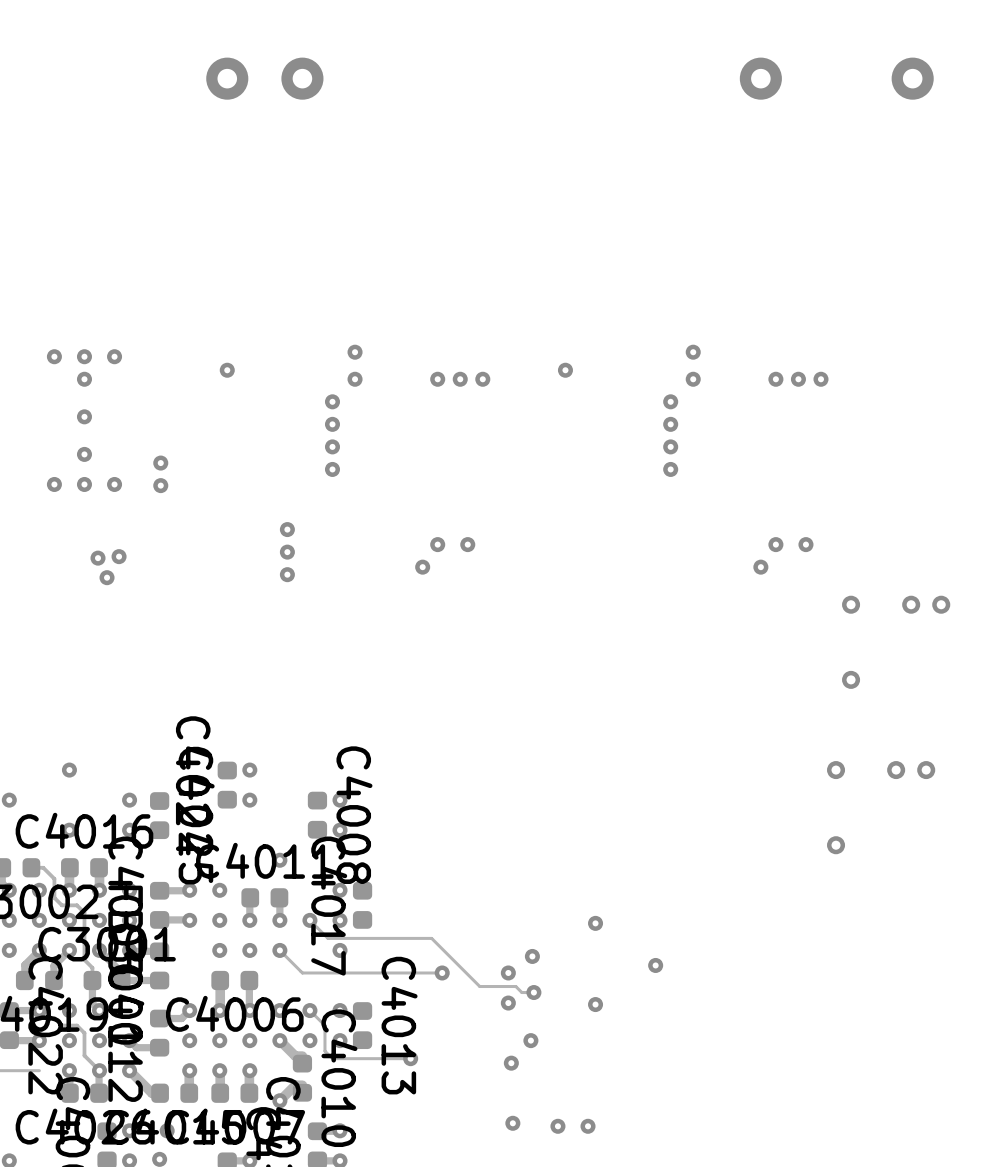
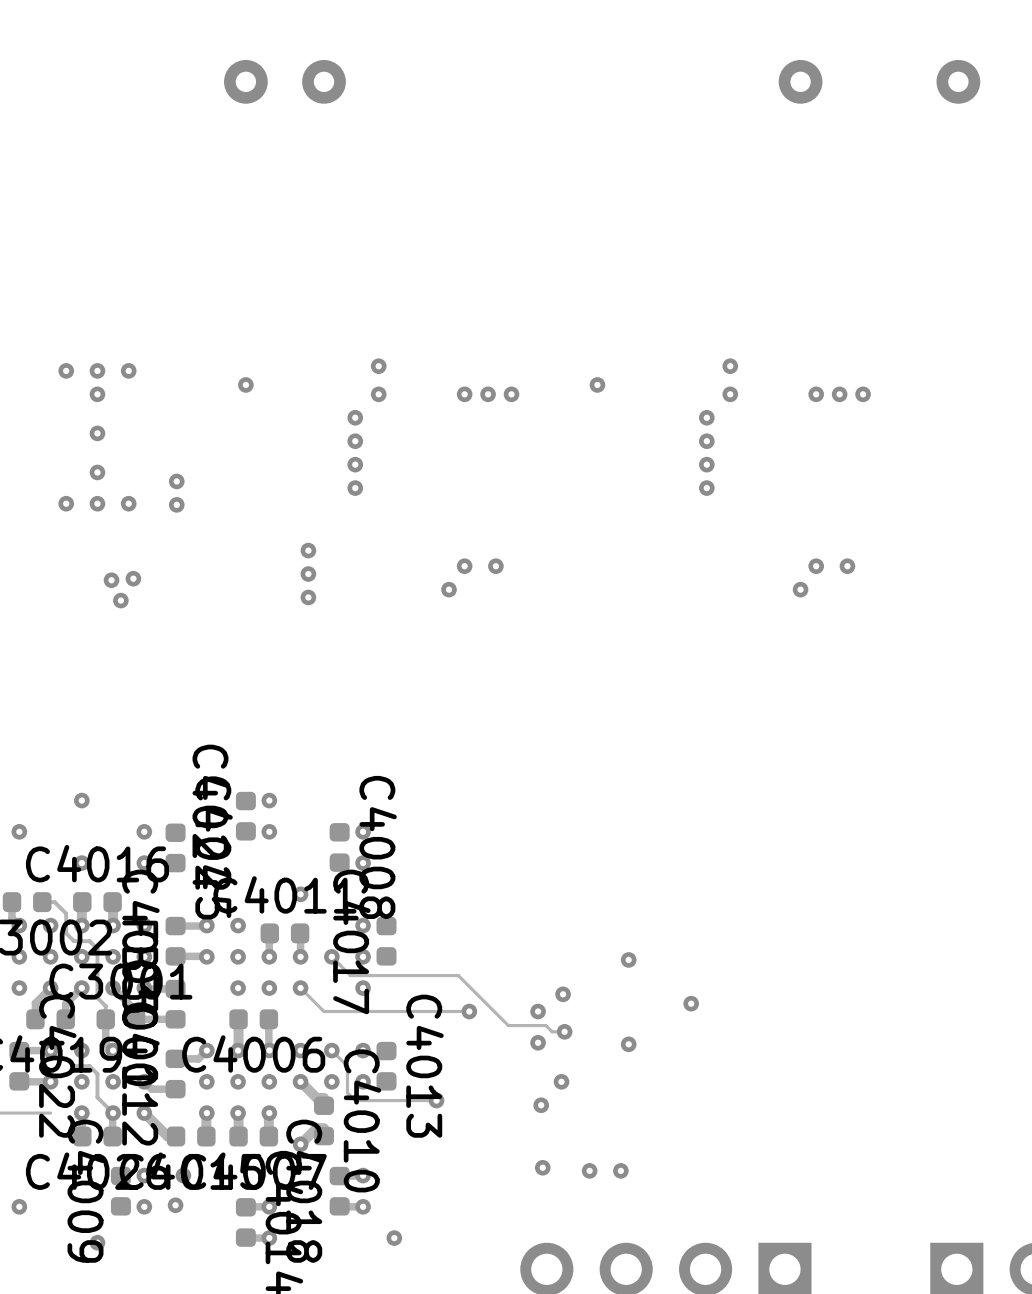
via: (851, 604) -> none
via: (911, 604) -> none
via: (941, 604) -> none
via: (851, 679) -> none
via: (836, 770) -> none
via: (896, 770) -> none
via: (926, 770) -> none
via: (836, 845) -> none

